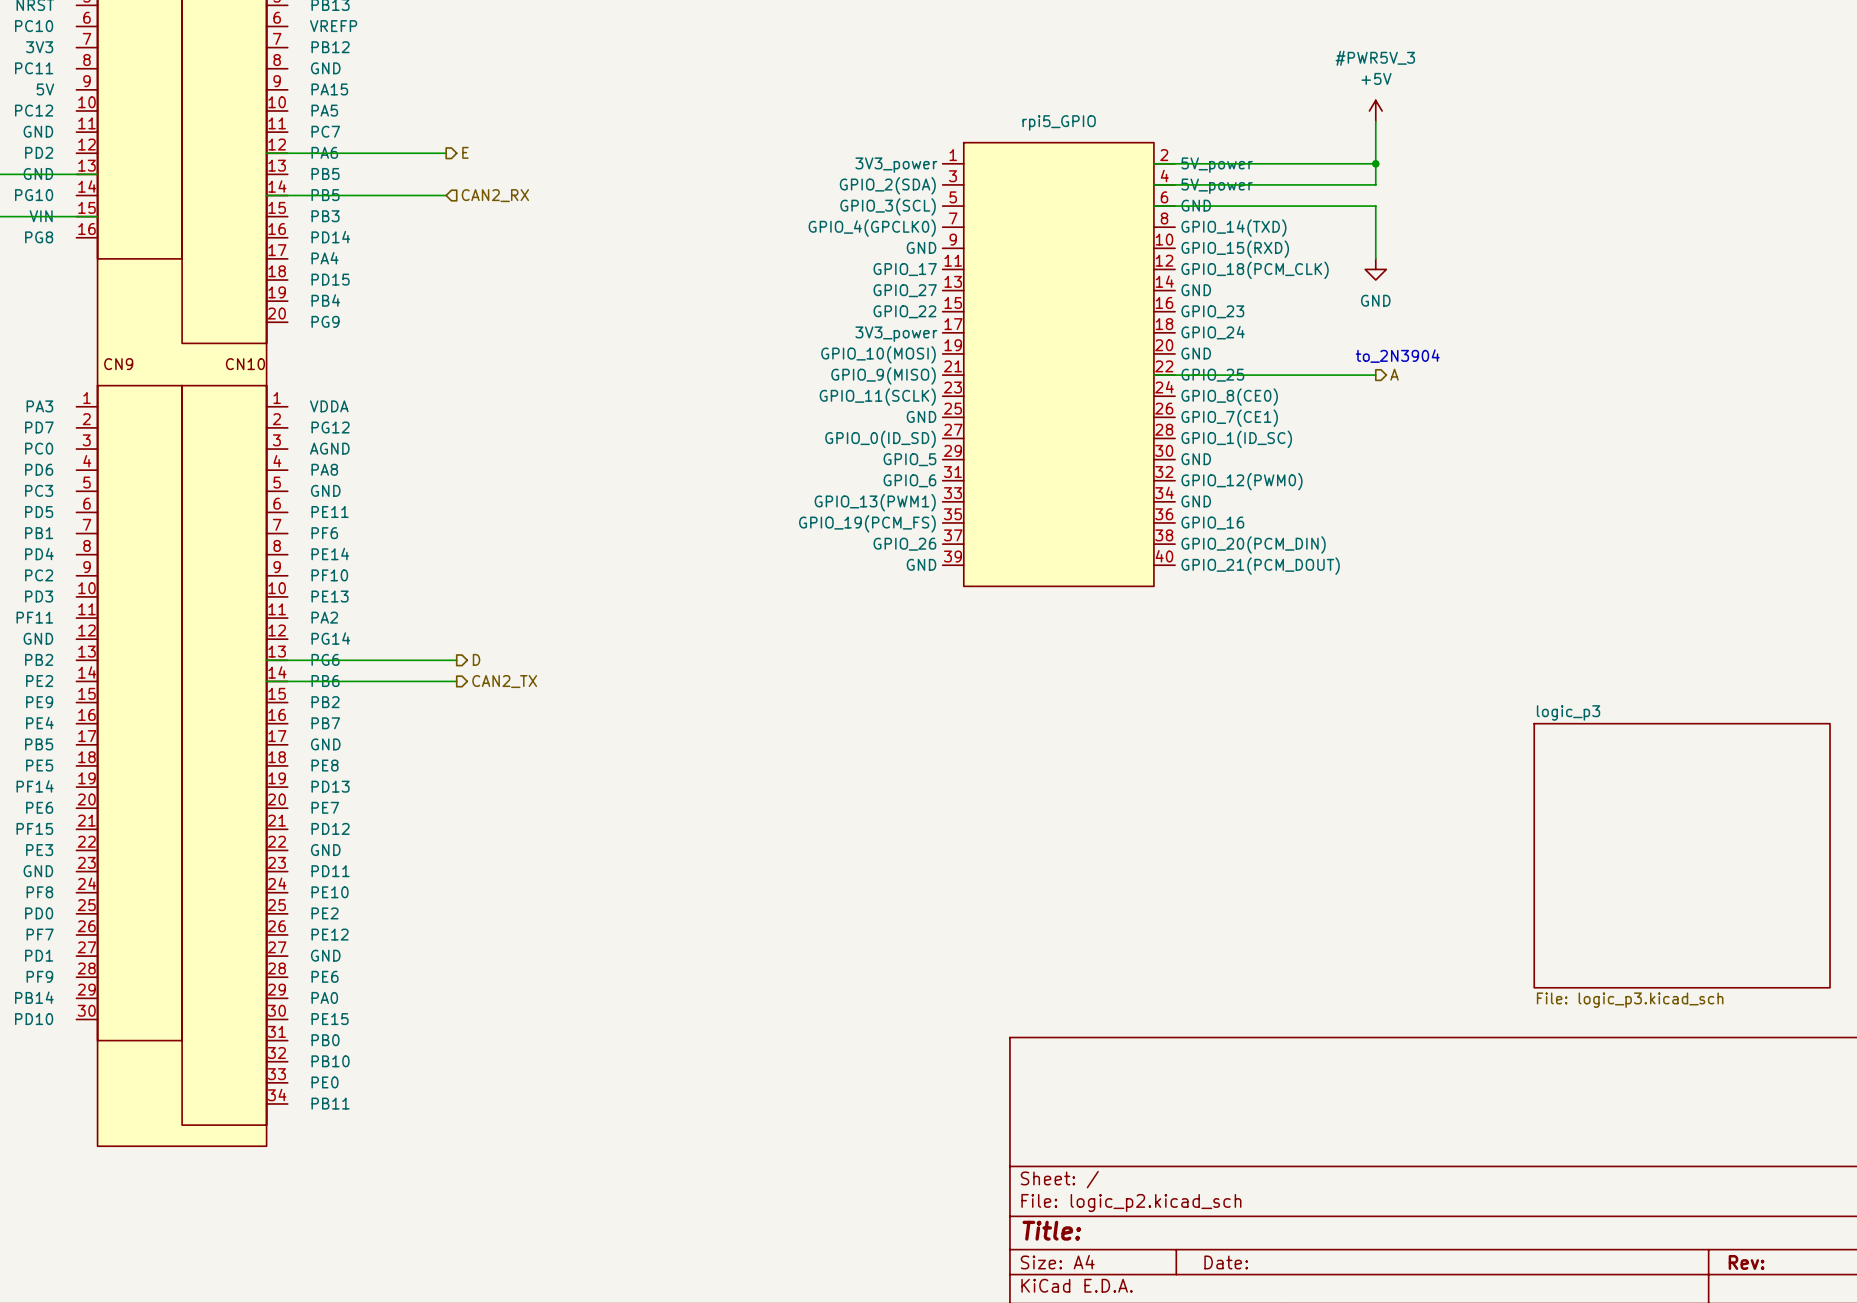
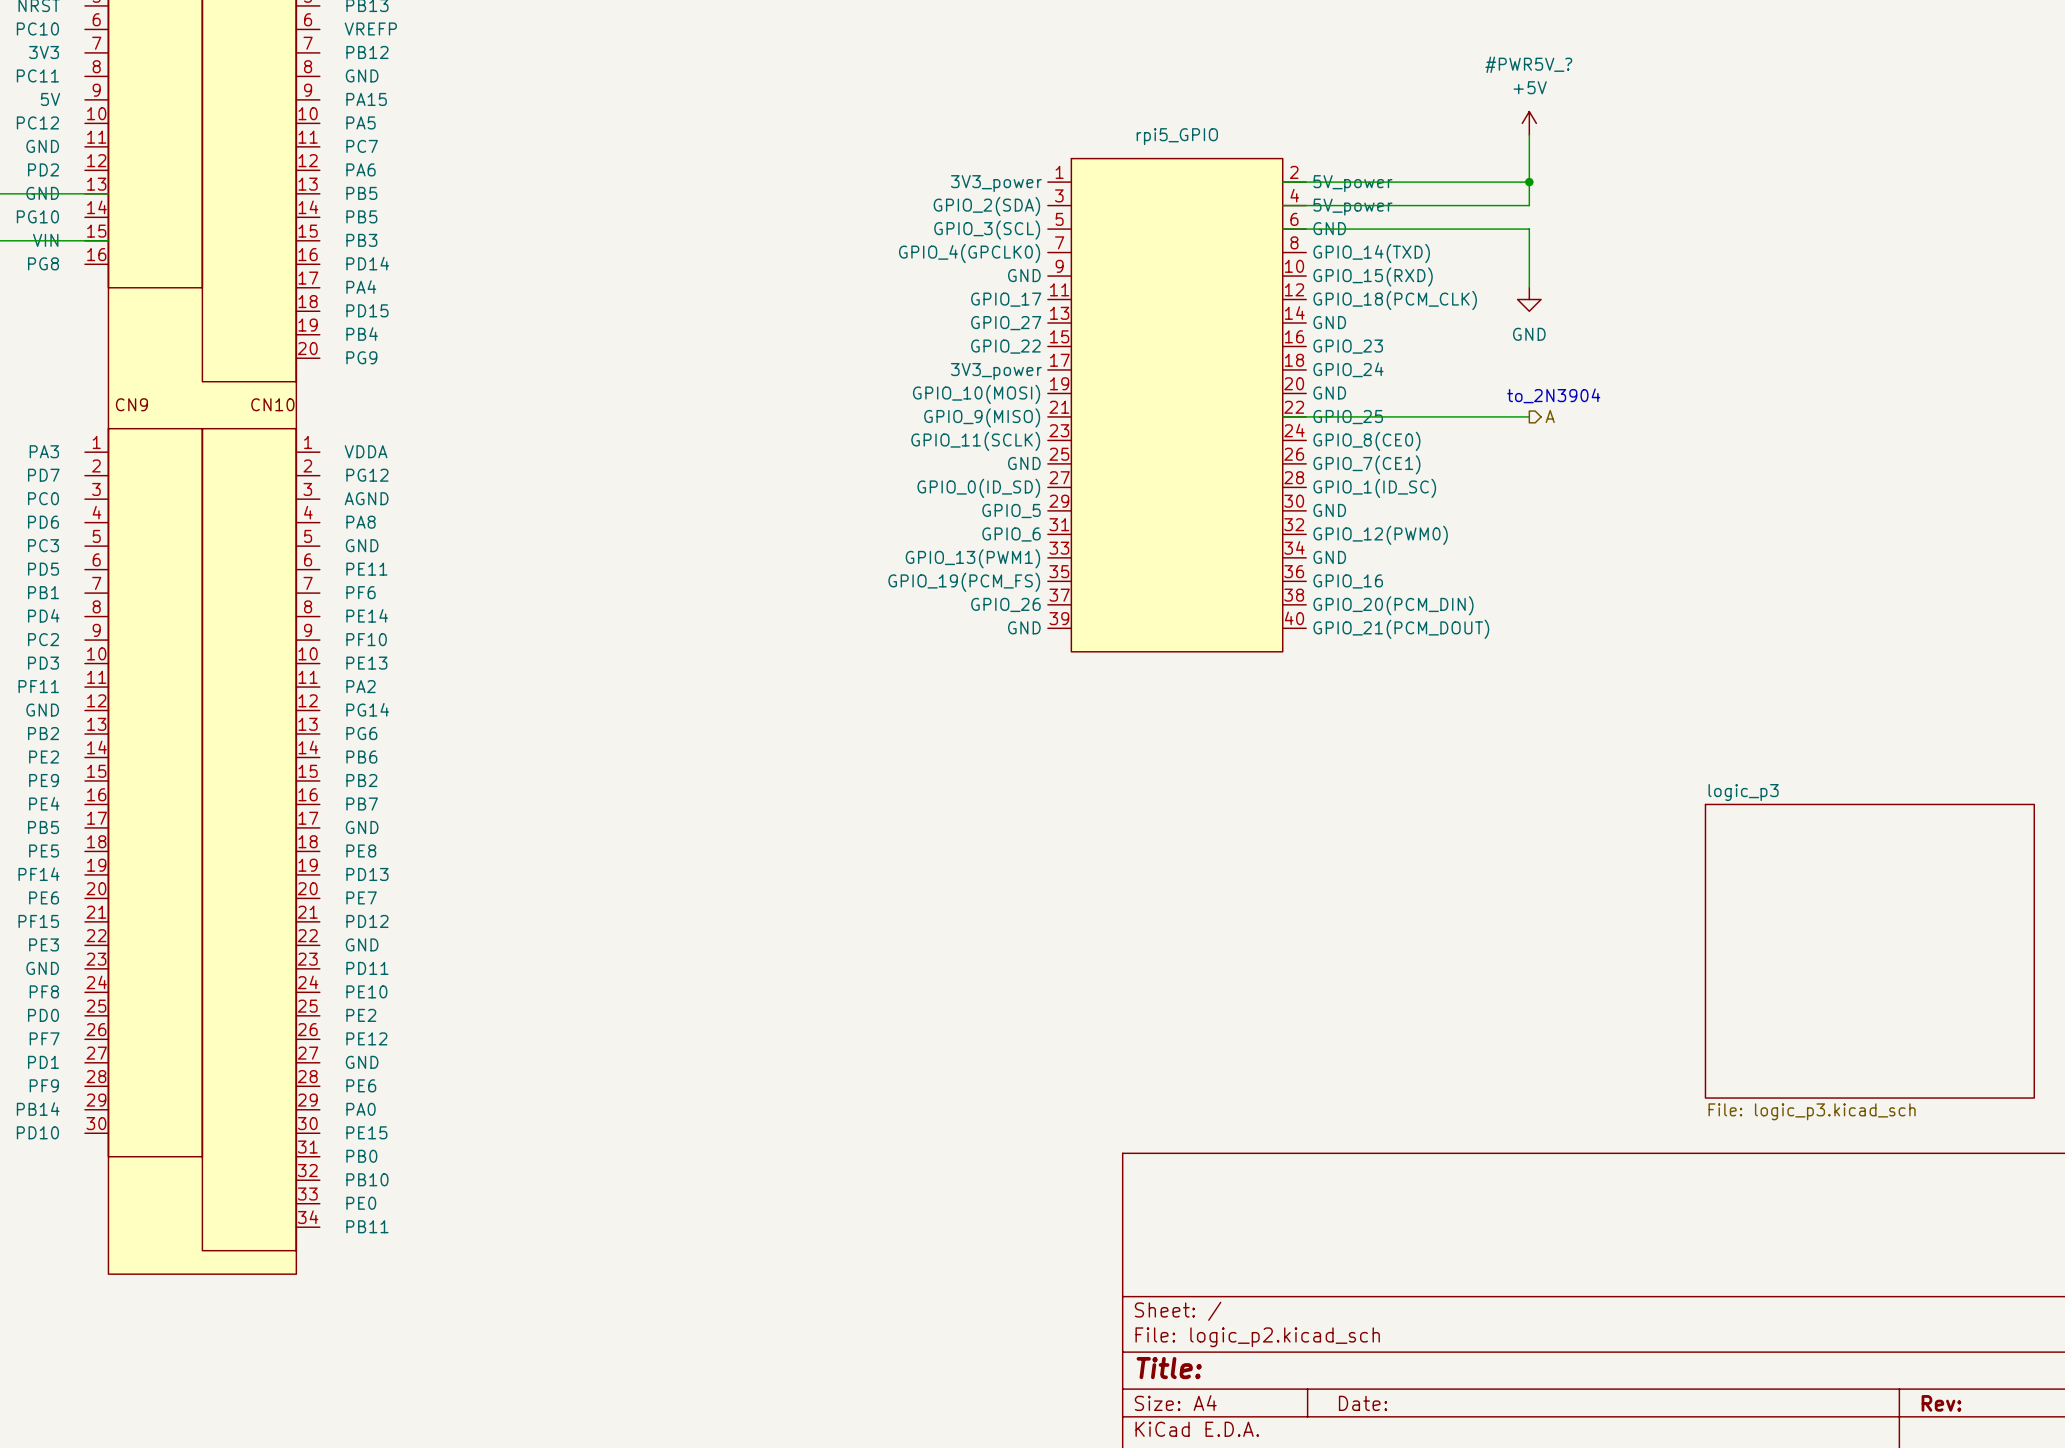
#PWR5V_3 name: #PWR5V_3 (1375, 58) -> #PWR5V_? (1528, 64)
hierarchical label: E (465, 152) -> none
wire: (266, 153) (446, 153) -> none
wire: (266, 195) (446, 195) -> none
hierarchical label: CAN2_RX (495, 195) -> none
hierarchical label: D (476, 659) -> none
wire: (266, 660) (456, 660) -> none
wire: (266, 681) (456, 681) -> none
hierarchical label: CAN2_TX (504, 681) -> none

